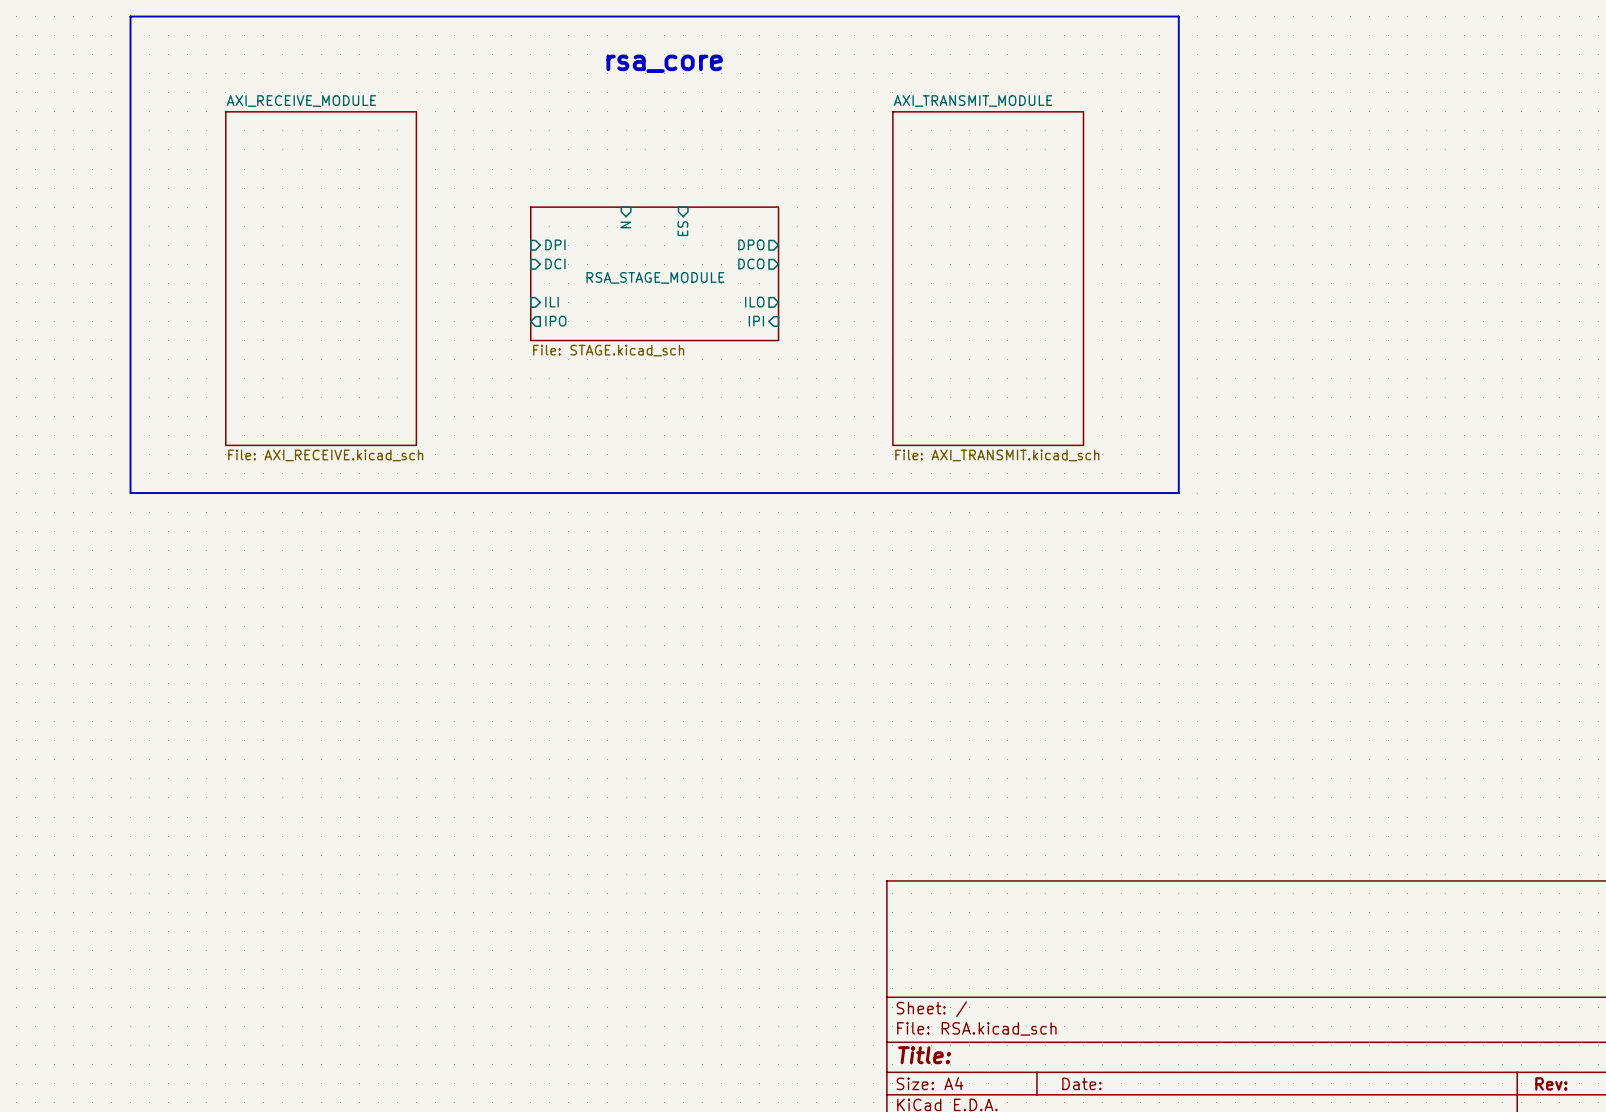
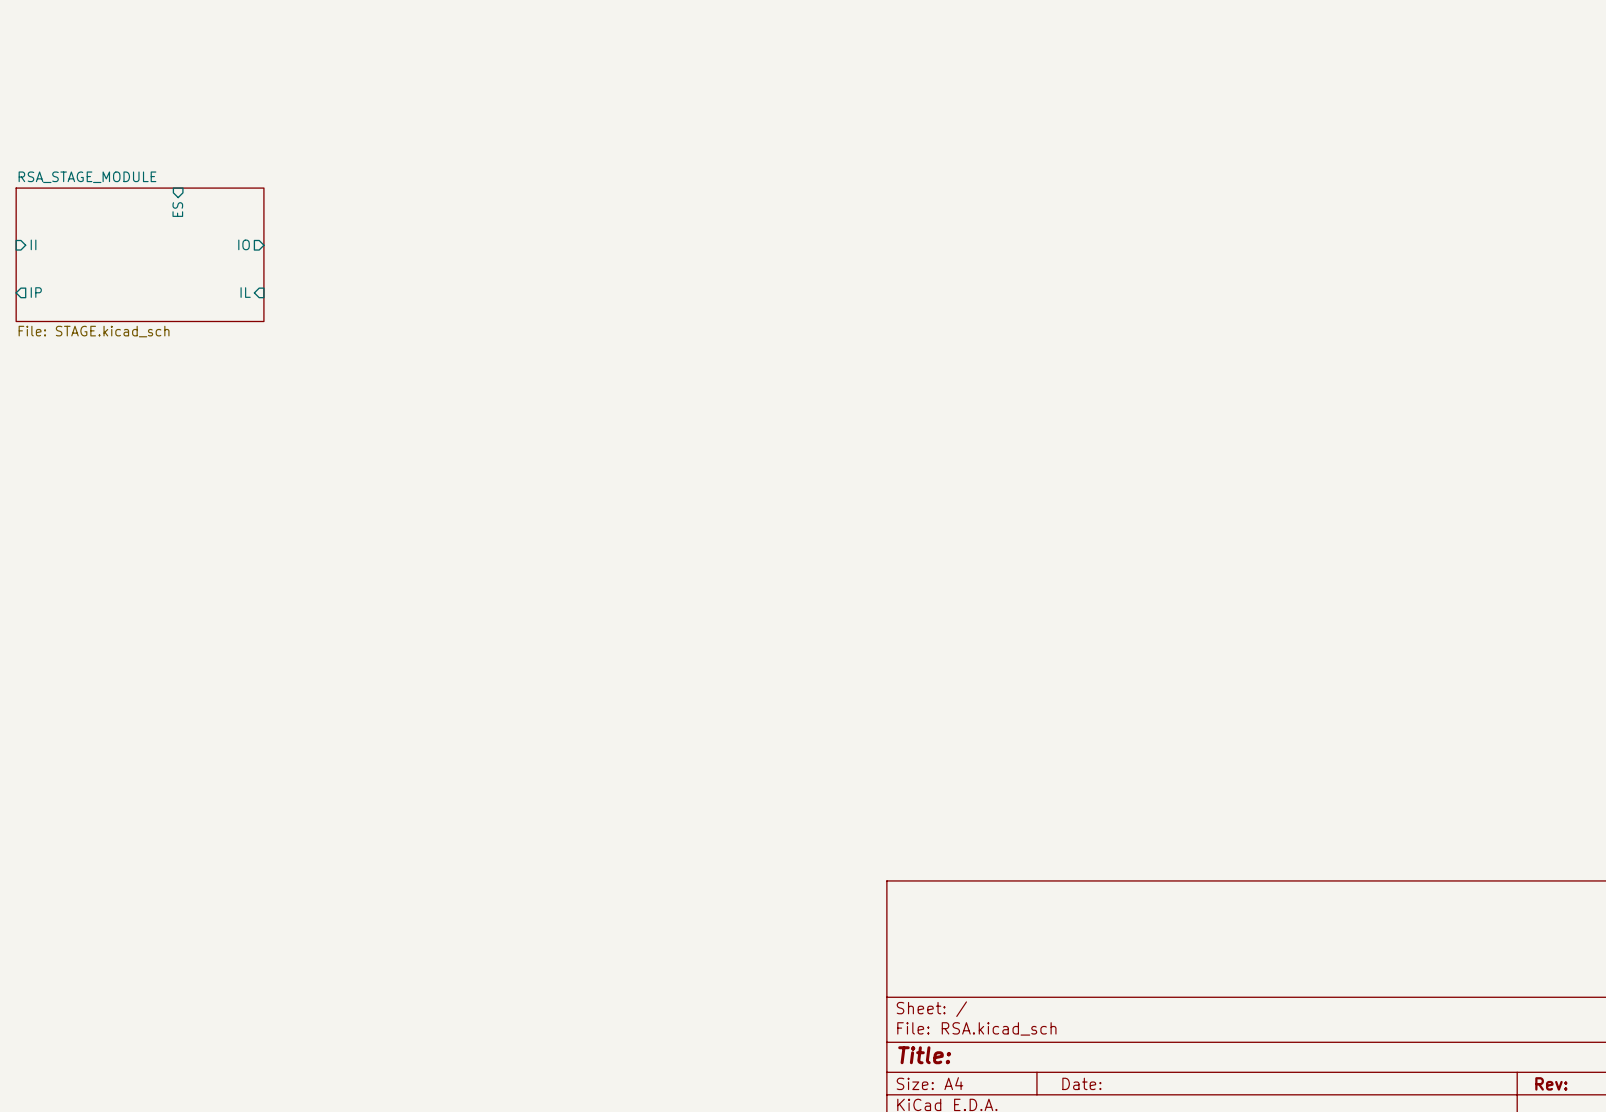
line: (130, 16) (1178, 16) (1178, 493) (130, 493) (130, 16) -> none
text: rsa_core (664, 63) -> none
sheet pin: none -> ES (177, 209)
sheet pin: N (625, 224) -> none
sheet pin: ES (682, 228) -> none
sheet pin: none -> II (33, 244)
sheet pin: none -> IO (244, 244)
sheet pin: DPI (555, 244) -> none
sheet pin: DPO (751, 244) -> none
sheet RSA_STAGE_MODULE: none -> File: STAGE.kicad_sch (140, 254)
sheet pin: DCI (555, 263) -> none
sheet pin: DCO (751, 263) -> none
sheet RSA_STAGE_MODULE: File: STAGE.kicad_sch (654, 273) -> none
sheet AXI_RECEIVE_MODULE: File: AXI_RECEIVE.kicad_sch (321, 278) -> none
sheet AXI_TRANSMIT_MODULE: File: AXI_TRANSMIT.kicad_sch (988, 278) -> none
sheet pin: none -> IP (36, 292)
sheet pin: none -> IL (245, 292)
sheet pin: ILI (552, 302) -> none
sheet pin: ILO (754, 302) -> none
sheet pin: IPO (555, 321) -> none
sheet pin: IPI (756, 321) -> none

